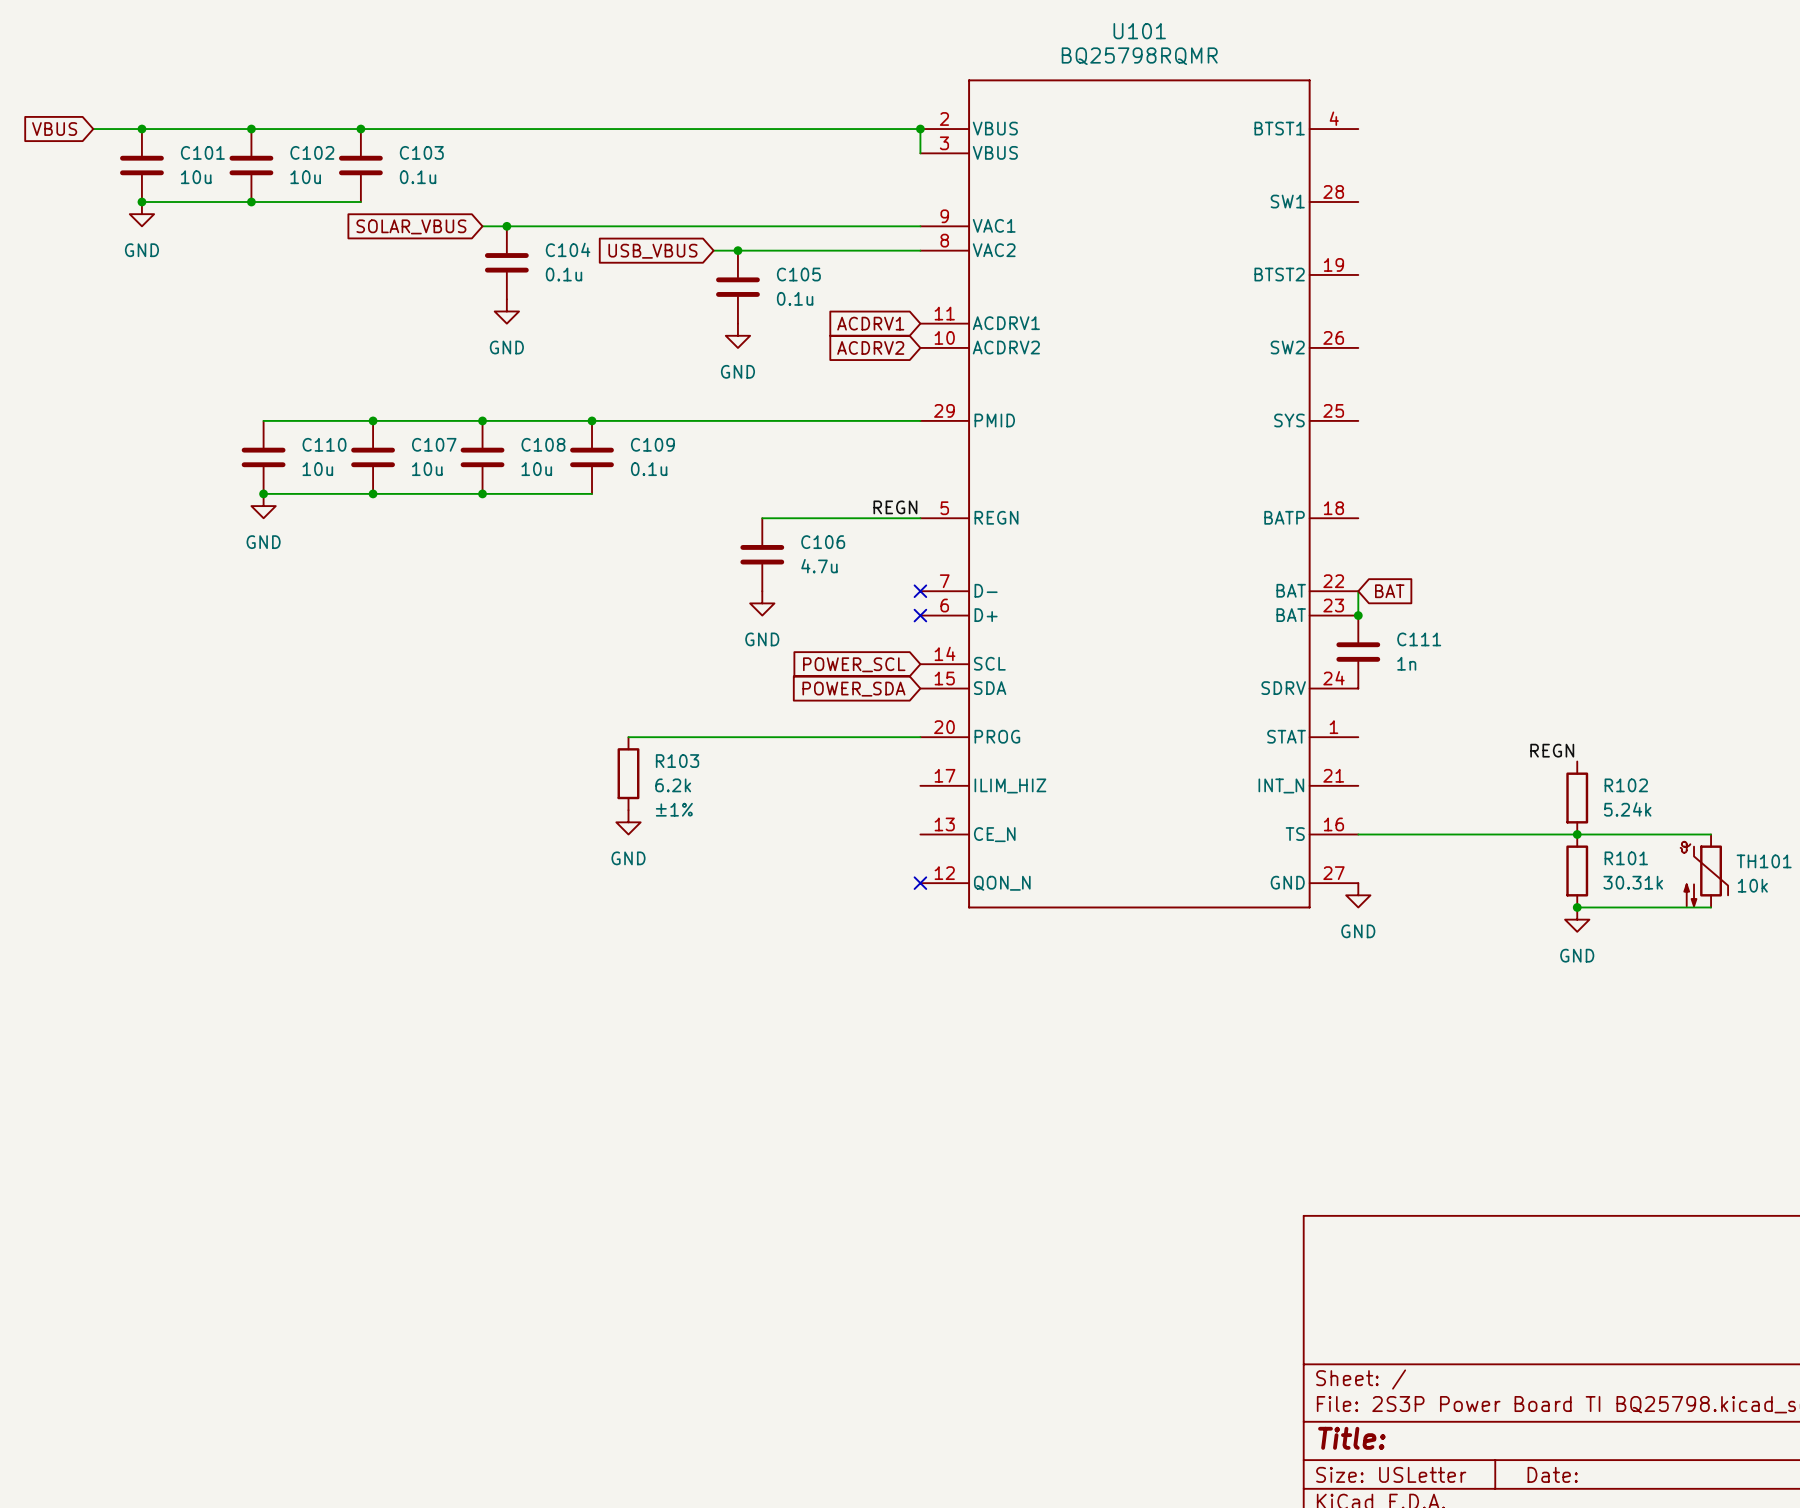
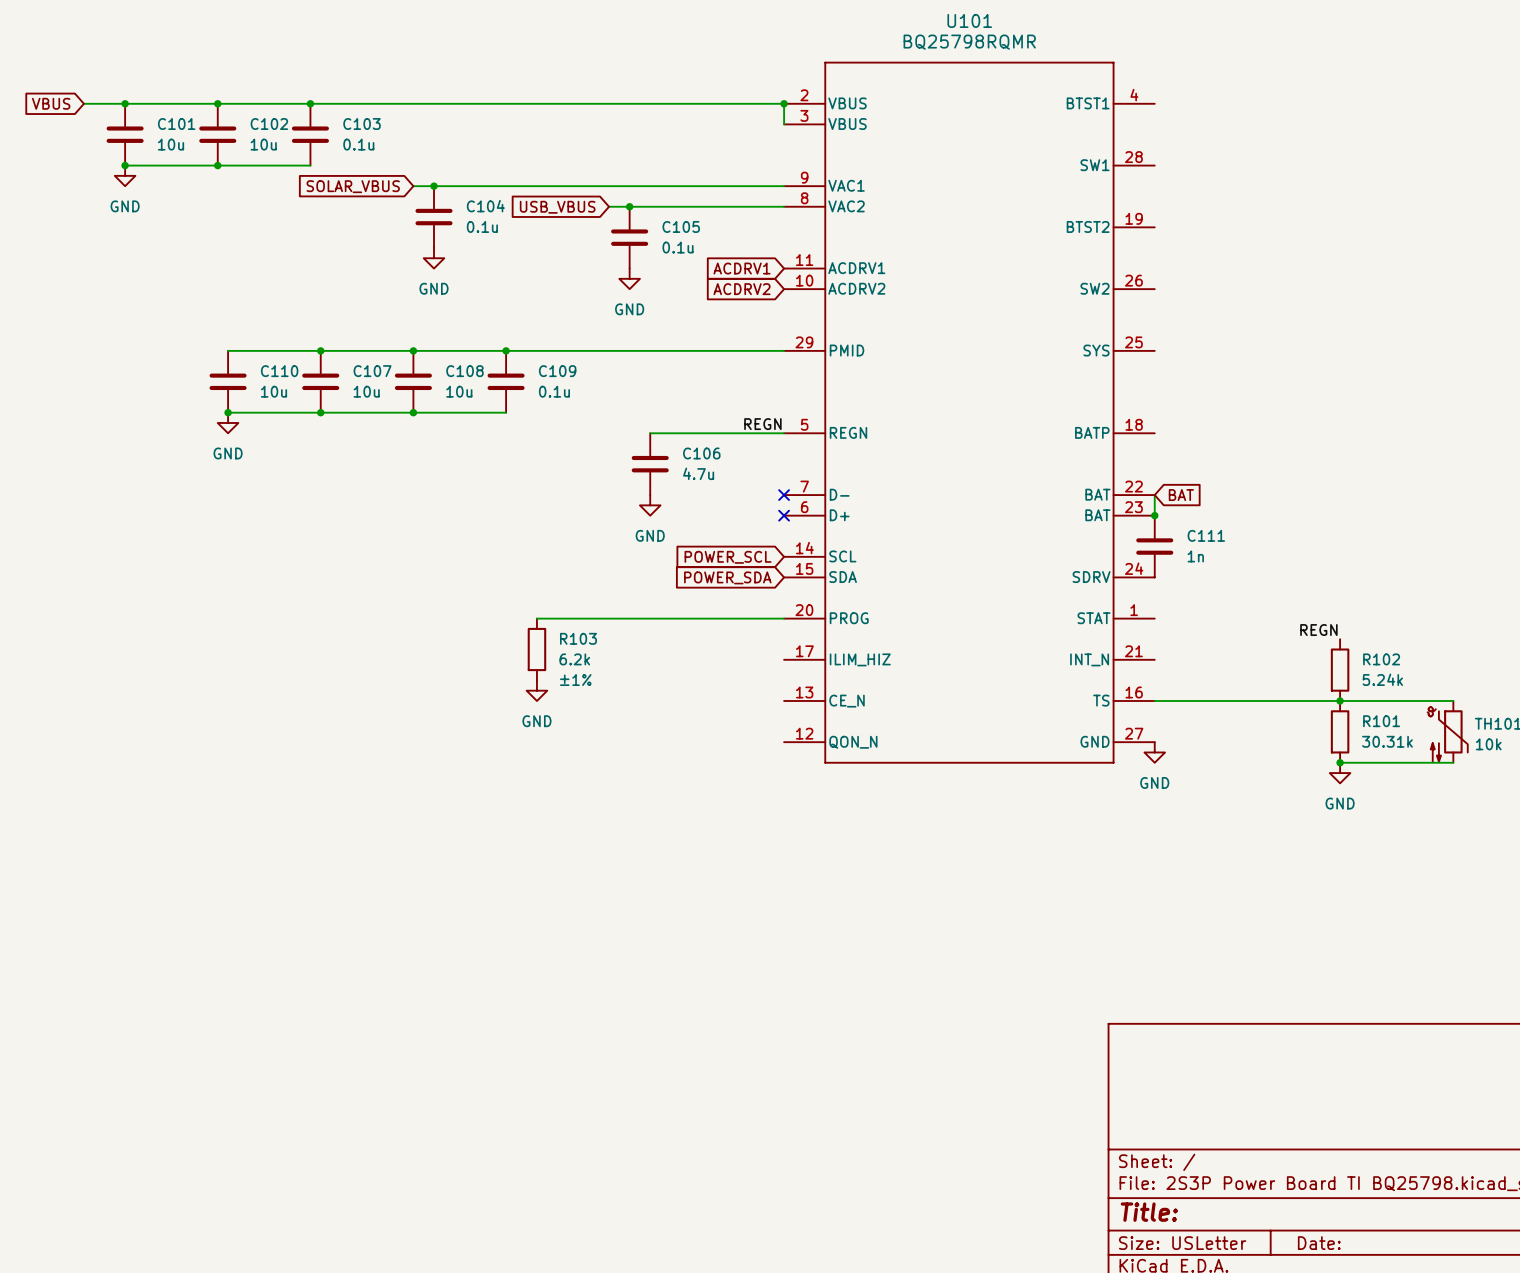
no-connect mark: (920, 883) -> none

